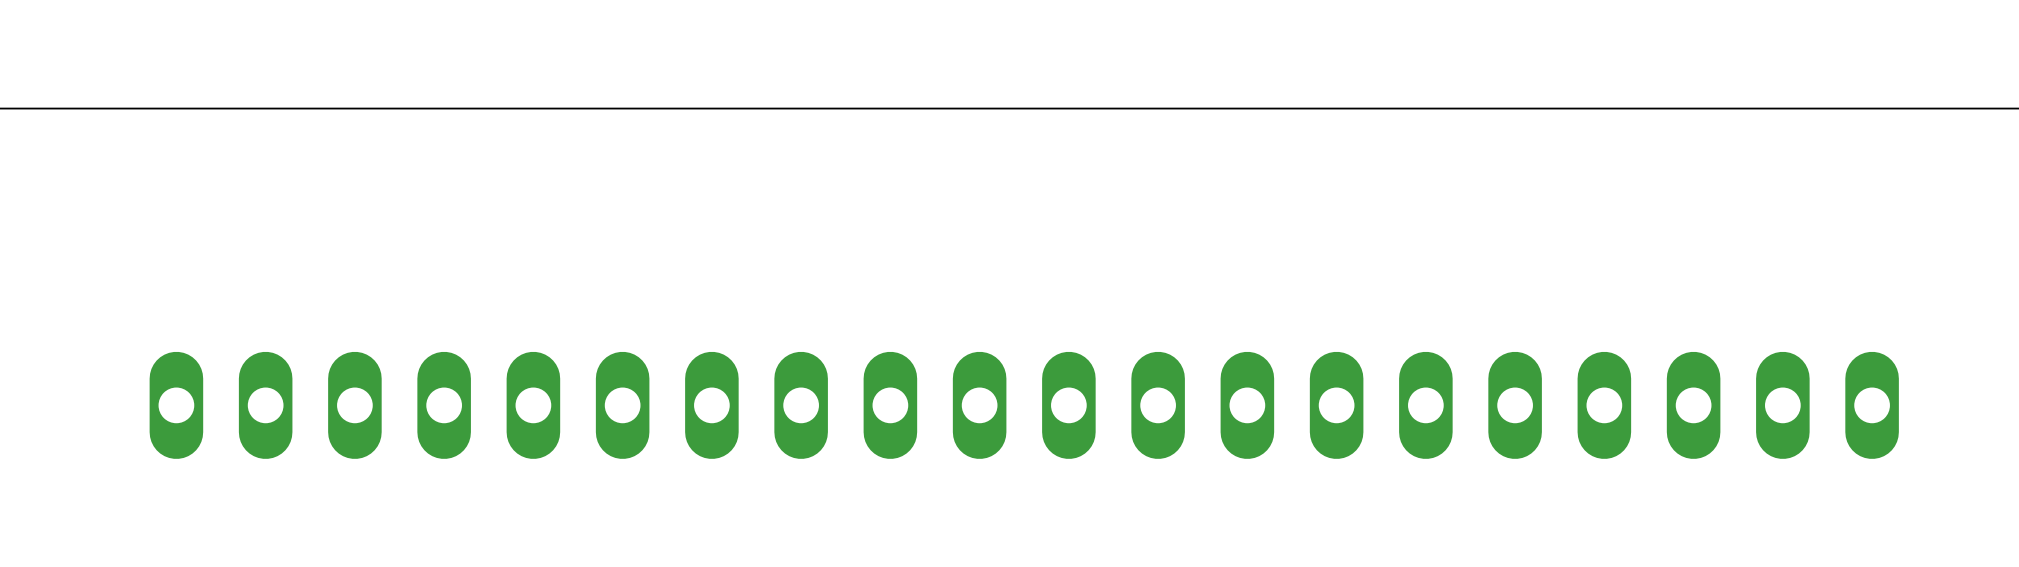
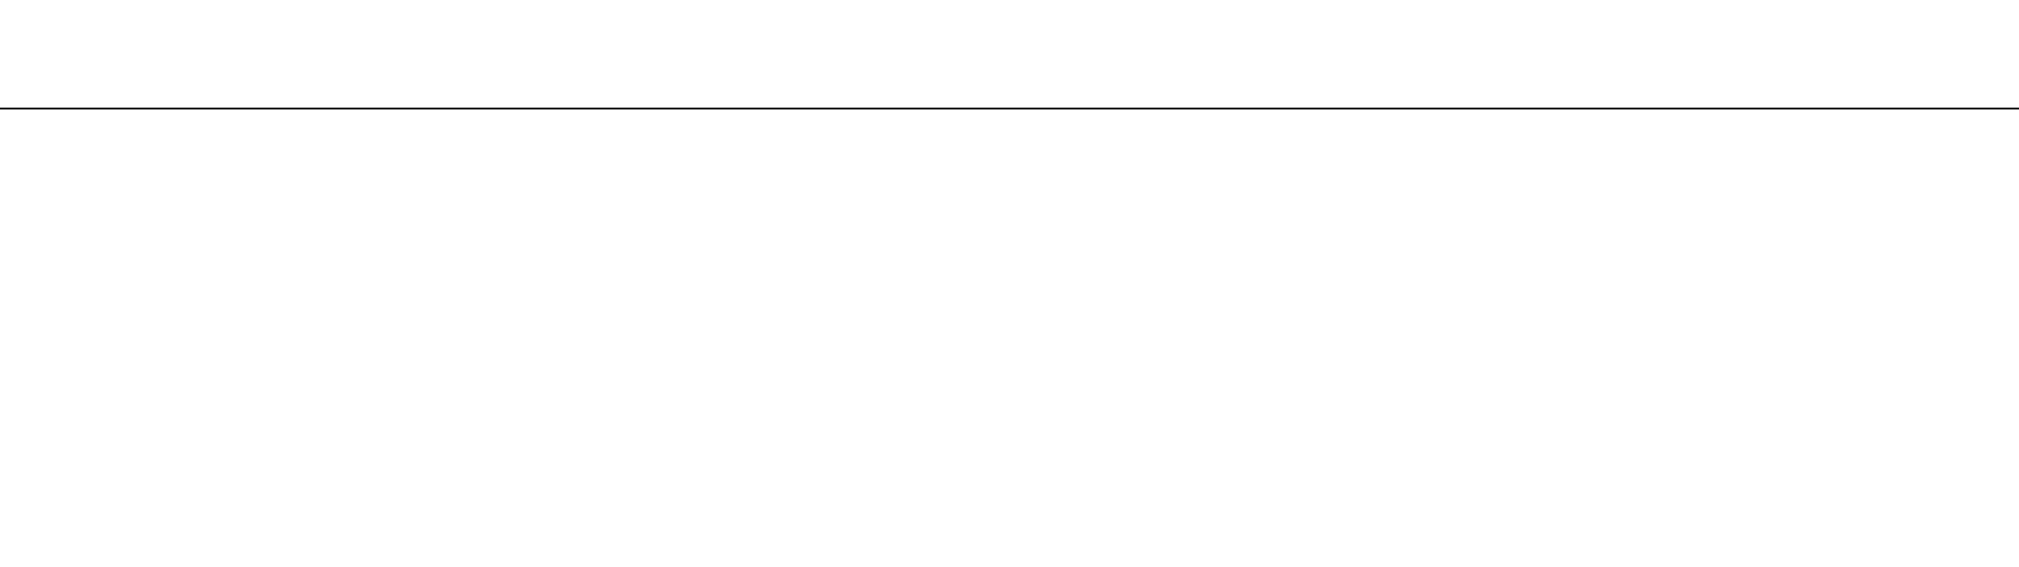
part: (1024, 405) -> none

